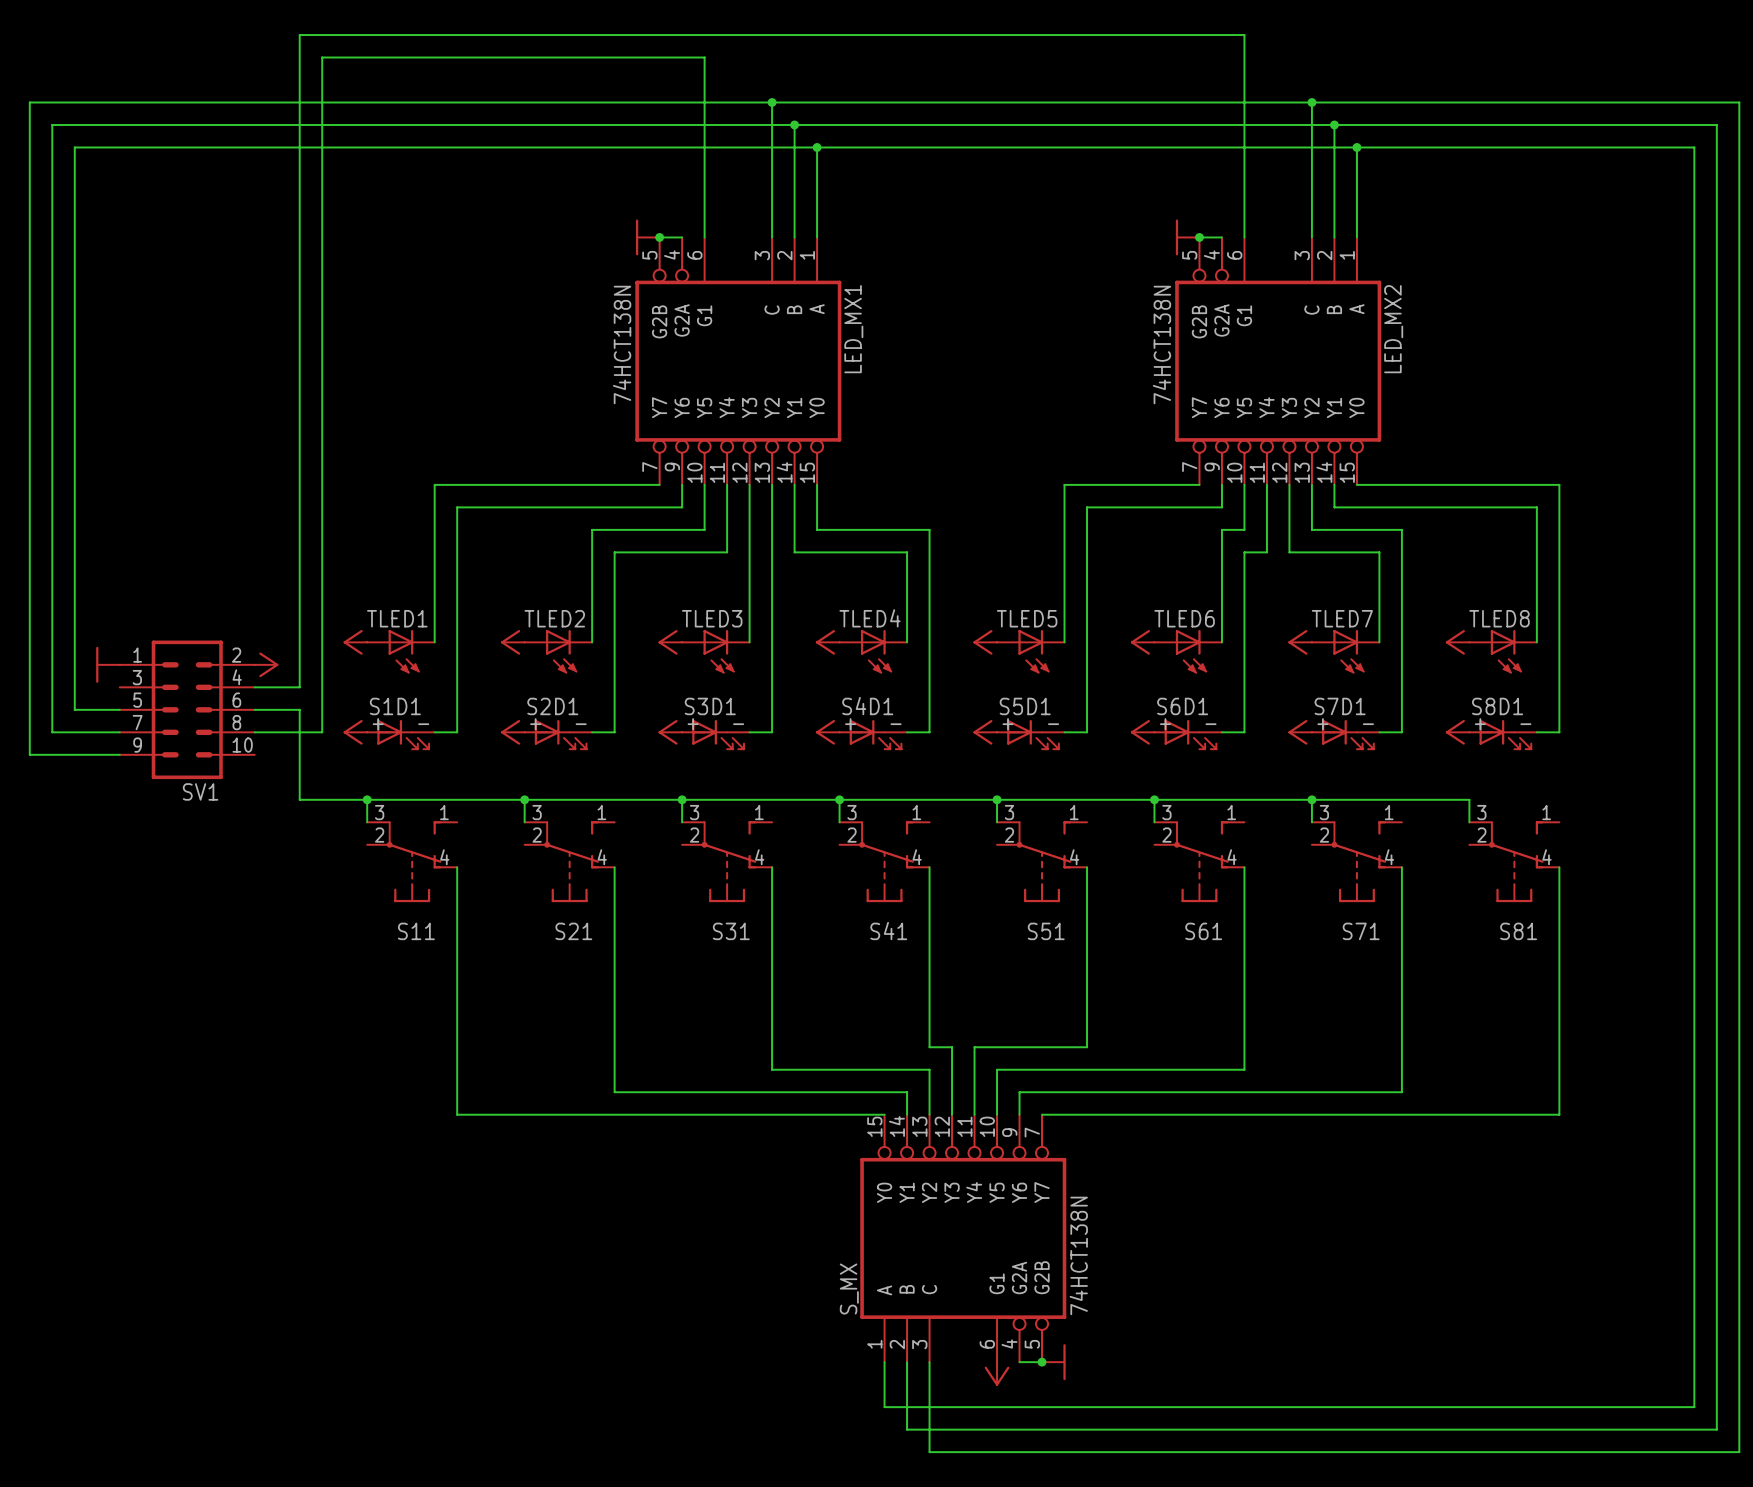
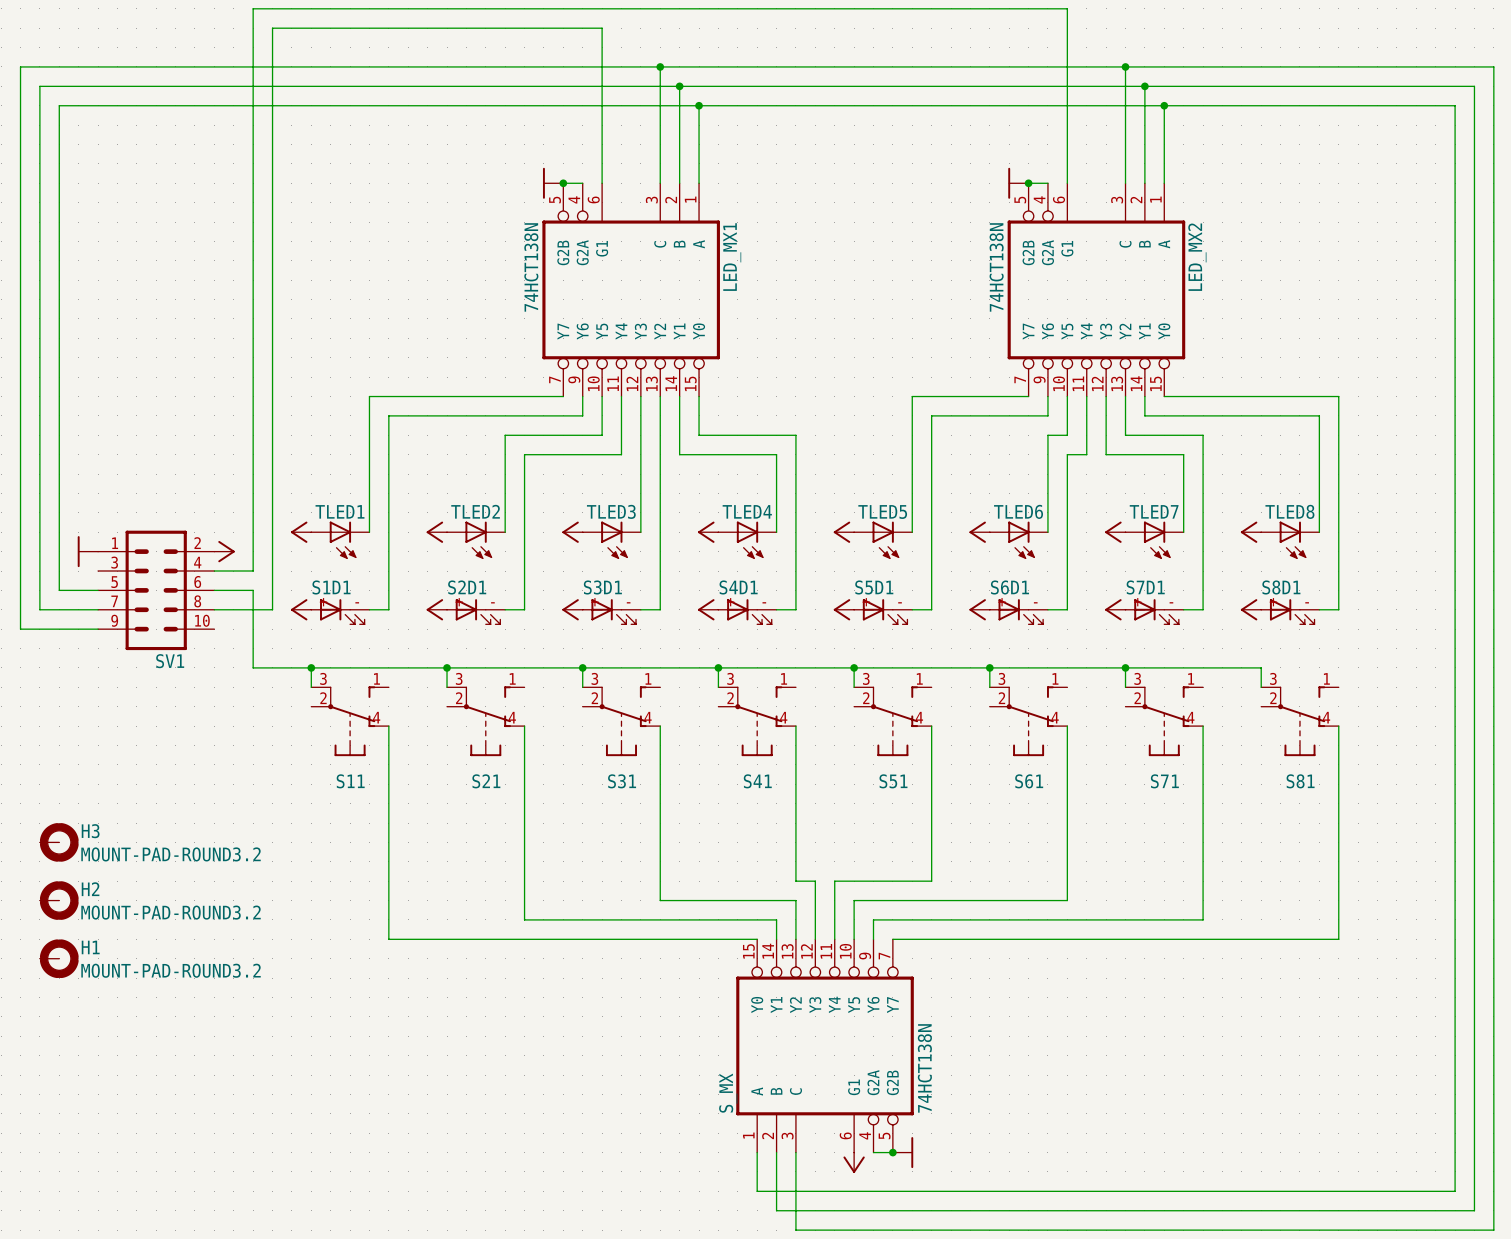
H3: none -> MOUNT-PAD-ROUND3.2 (59, 842)
H2: none -> MOUNT-PAD-ROUND3.2 (59, 900)
H1: none -> MOUNT-PAD-ROUND3.2 (59, 958)

